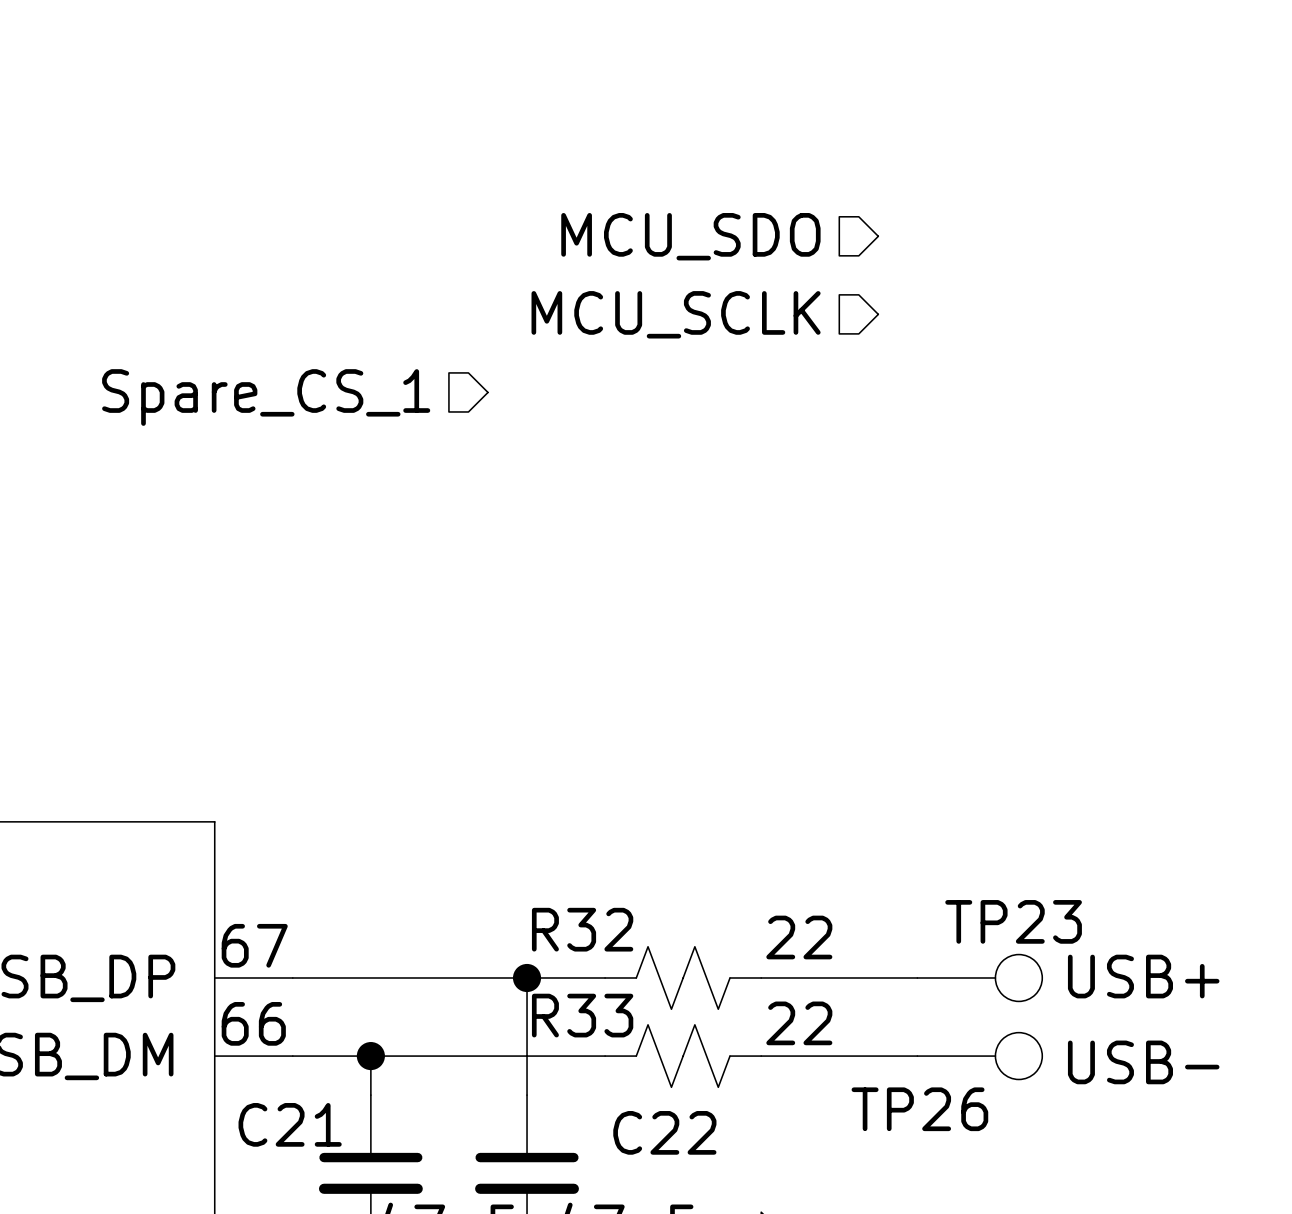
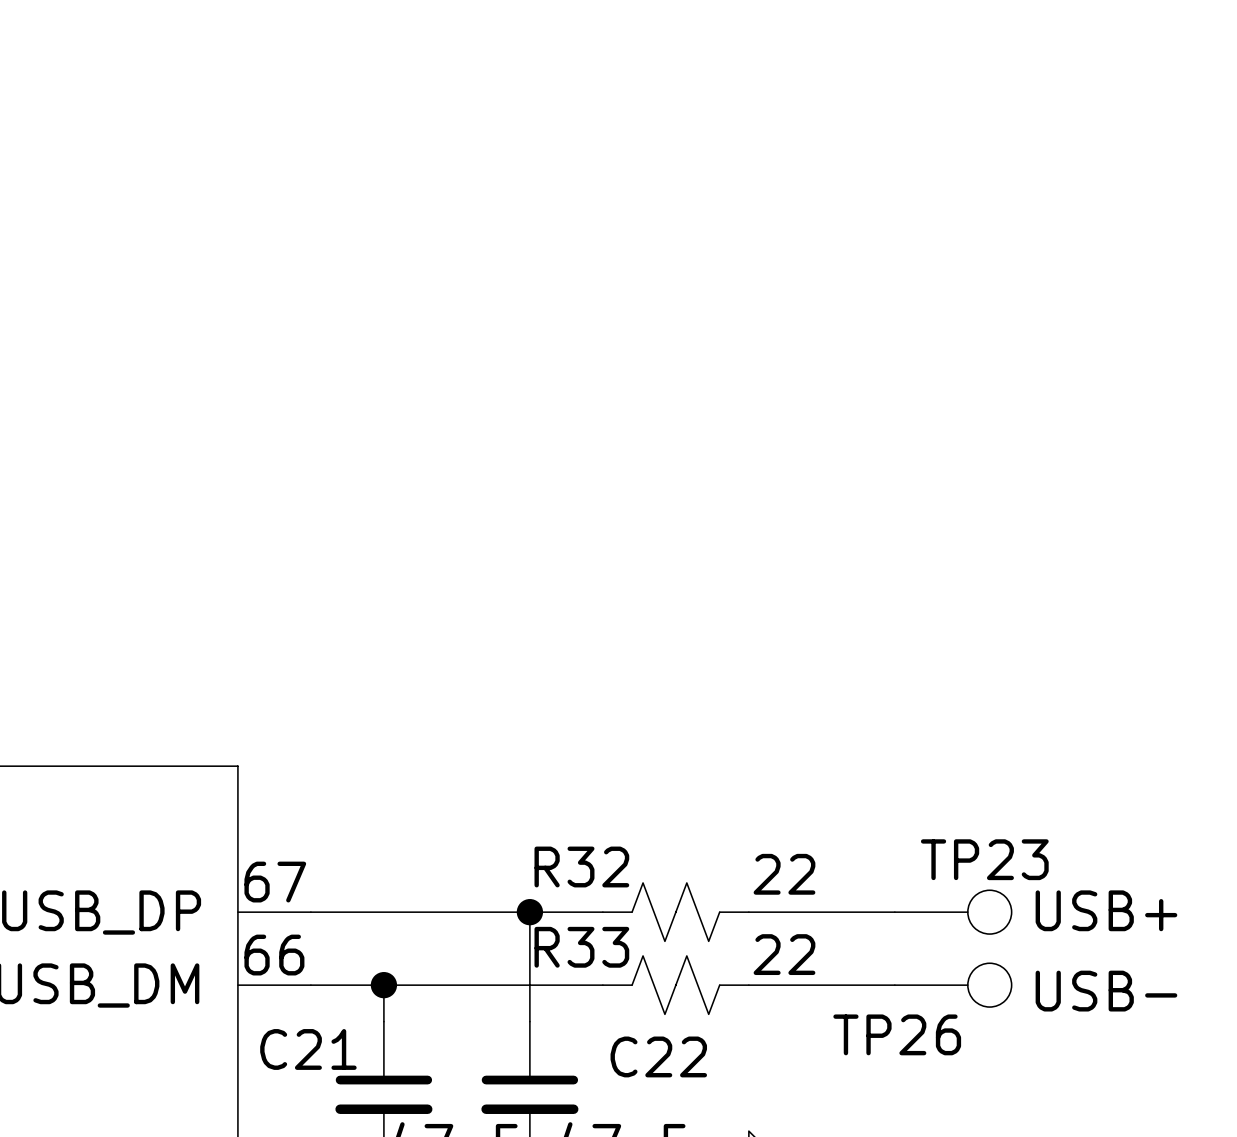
hierarchical label: MCU_SDO (690, 236) -> none
hierarchical label: MCU_SCLK (676, 314) -> none
hierarchical label: Spare_CS_1 (266, 397) -> none

